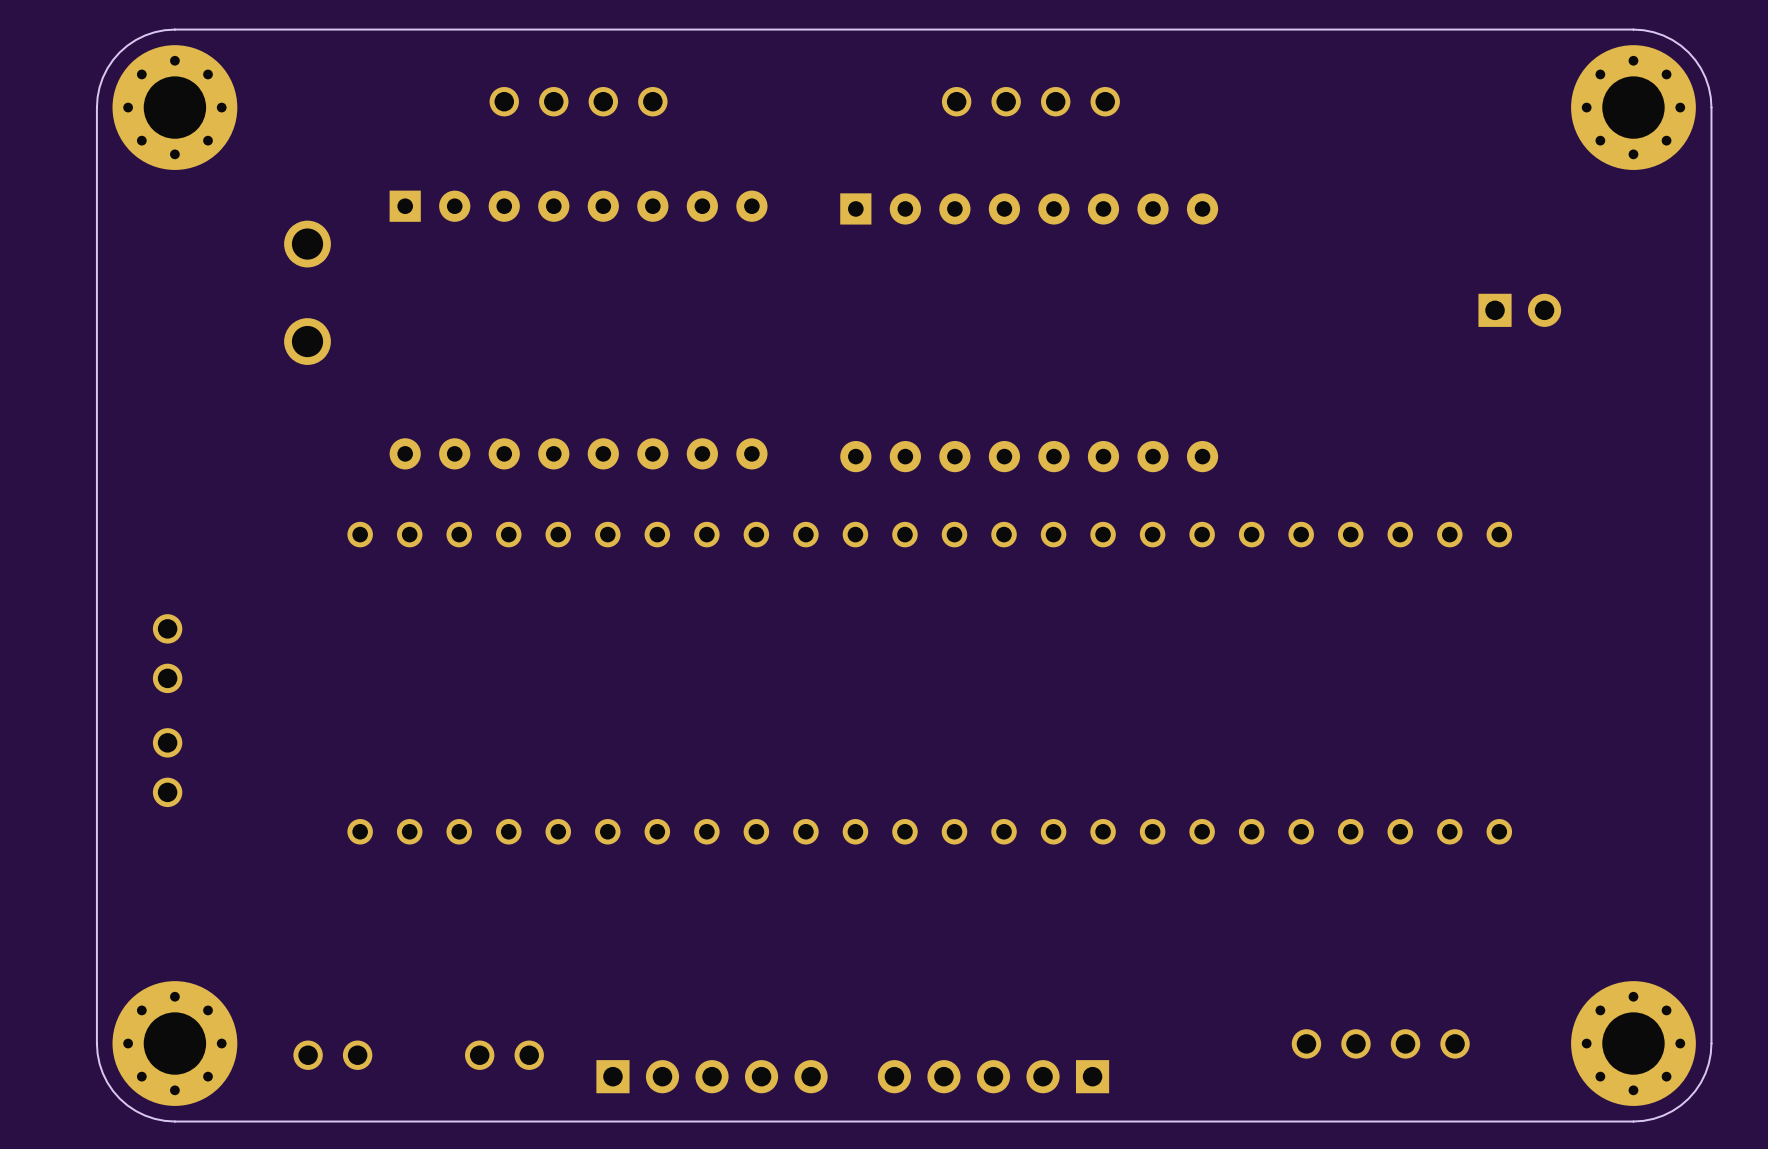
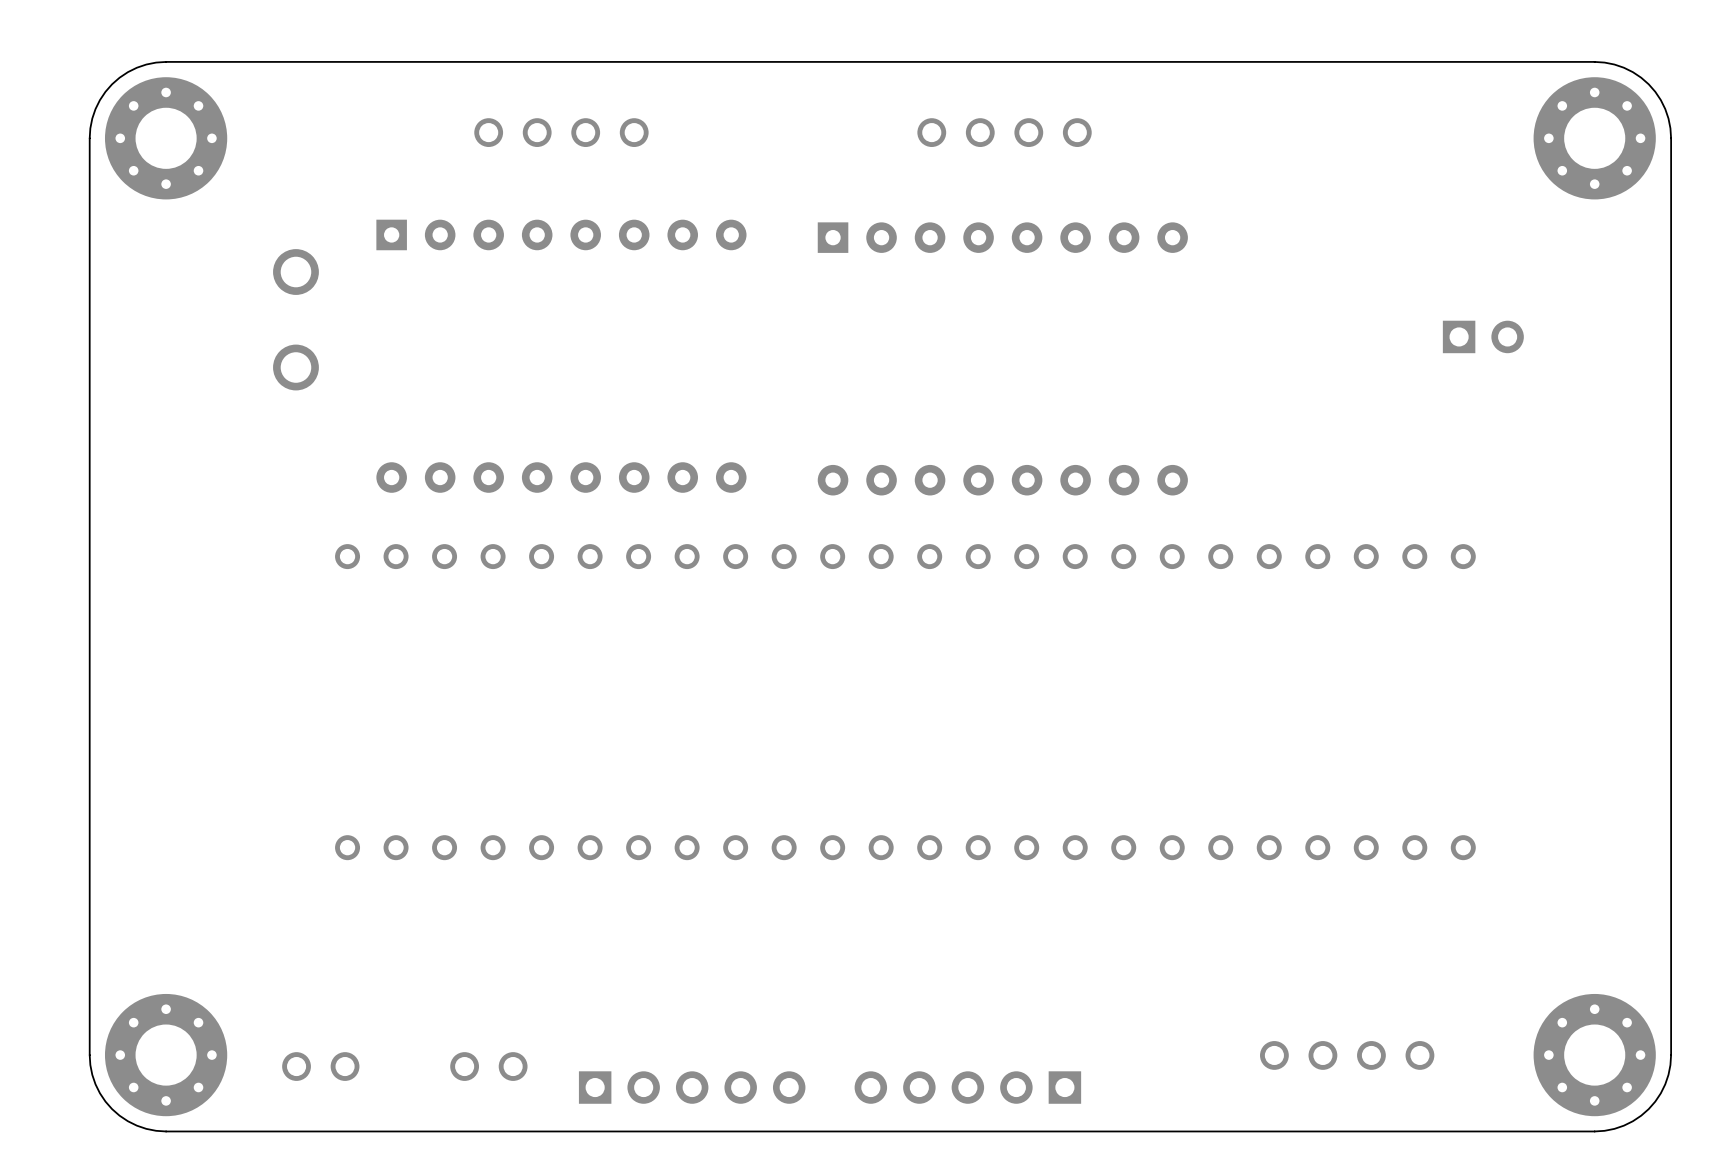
part: (167, 653) -> none
part: (167, 767) -> none

